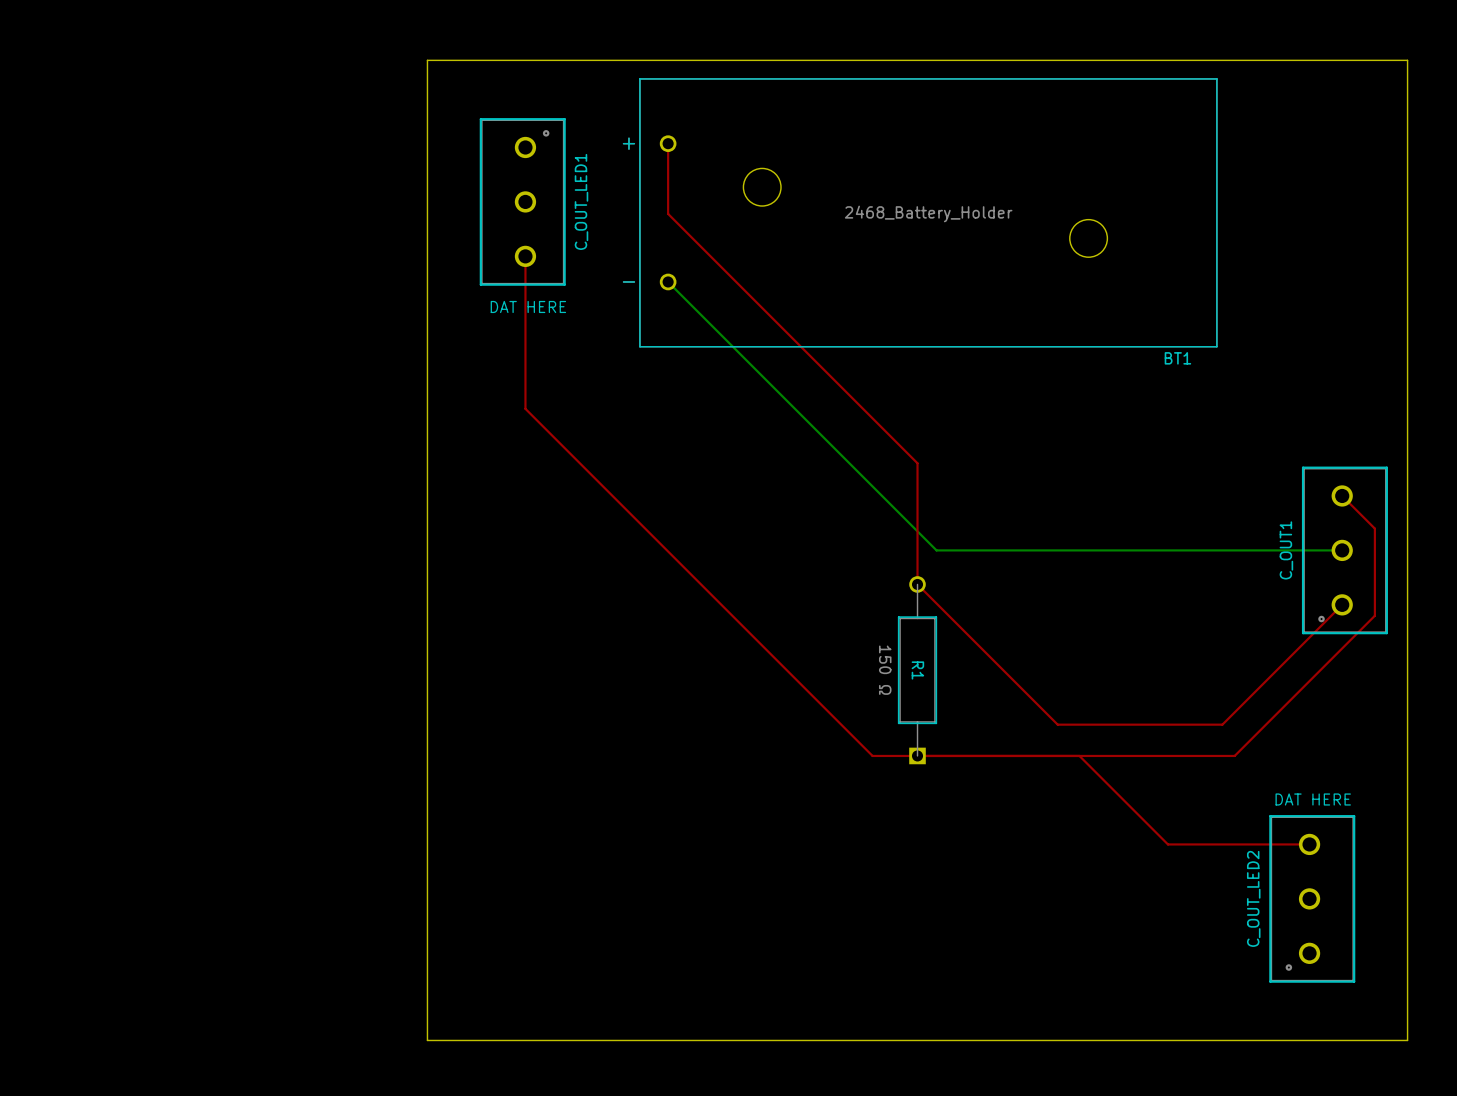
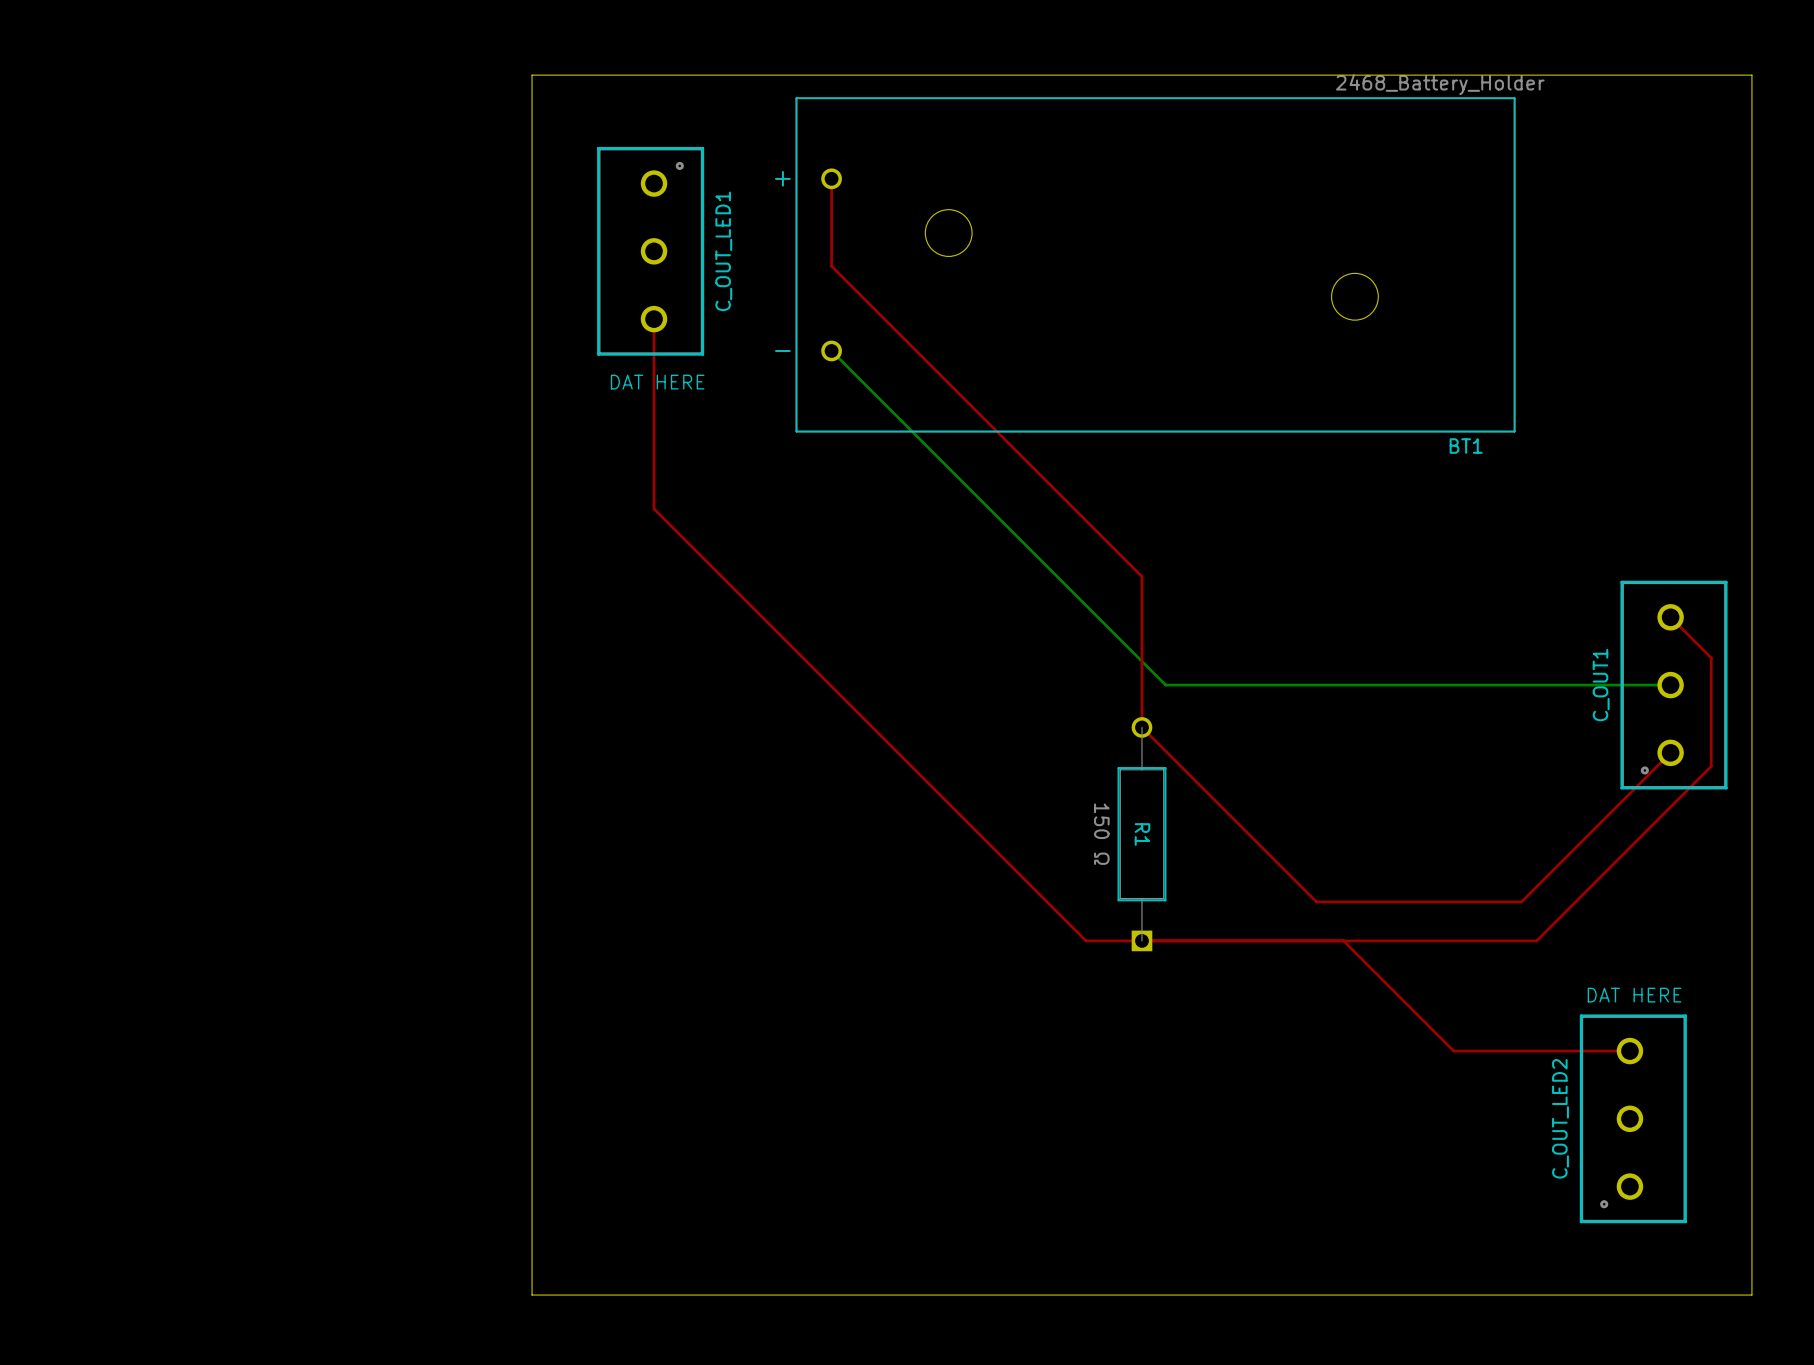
BT1 value position: 2468_Battery_Holder (928, 213) -> 2468_Battery_Holder (1440, 84)

